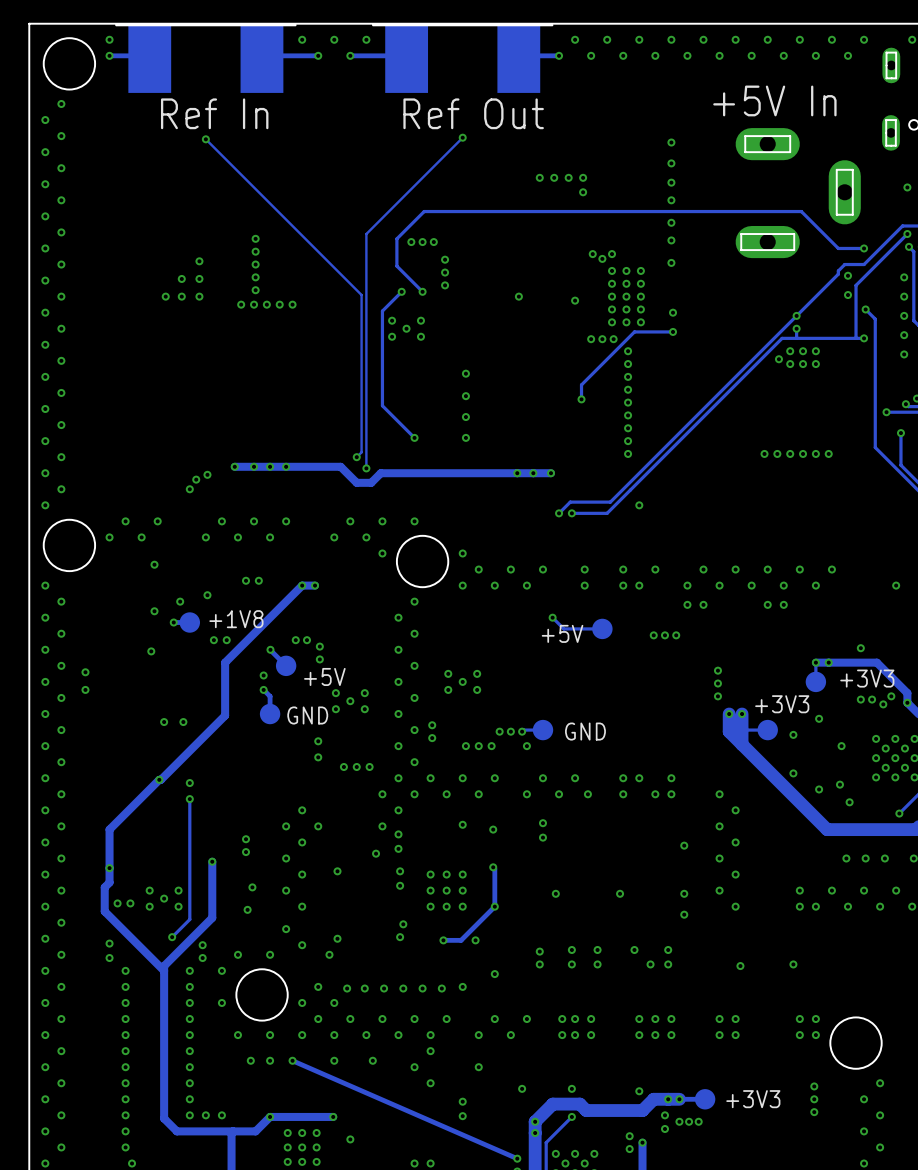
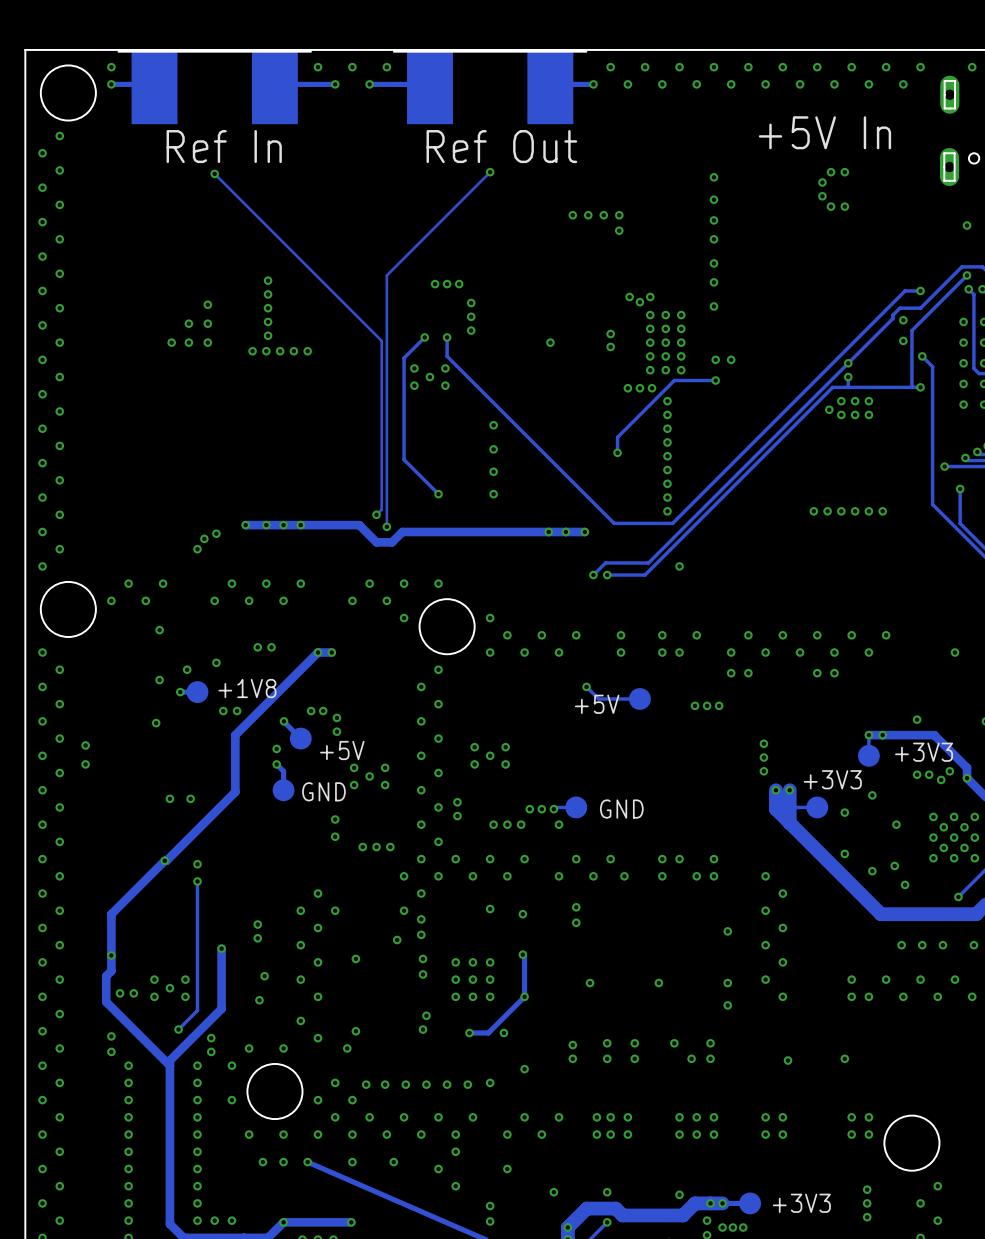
via: none -> (831, 172)
via: none -> (844, 172)
via: none -> (822, 182)
via: none -> (822, 196)
via: none -> (831, 206)
via: none -> (844, 206)
part: (798, 193) -> none
track: (849, 248) (838, 248) (801, 211) (424, 211) (396, 238) (396, 266) (422, 291) -> (905, 290) (672, 523) (614, 523) (447, 356) (447, 337)
via: none -> (610, 334)
via: none -> (731, 359)

